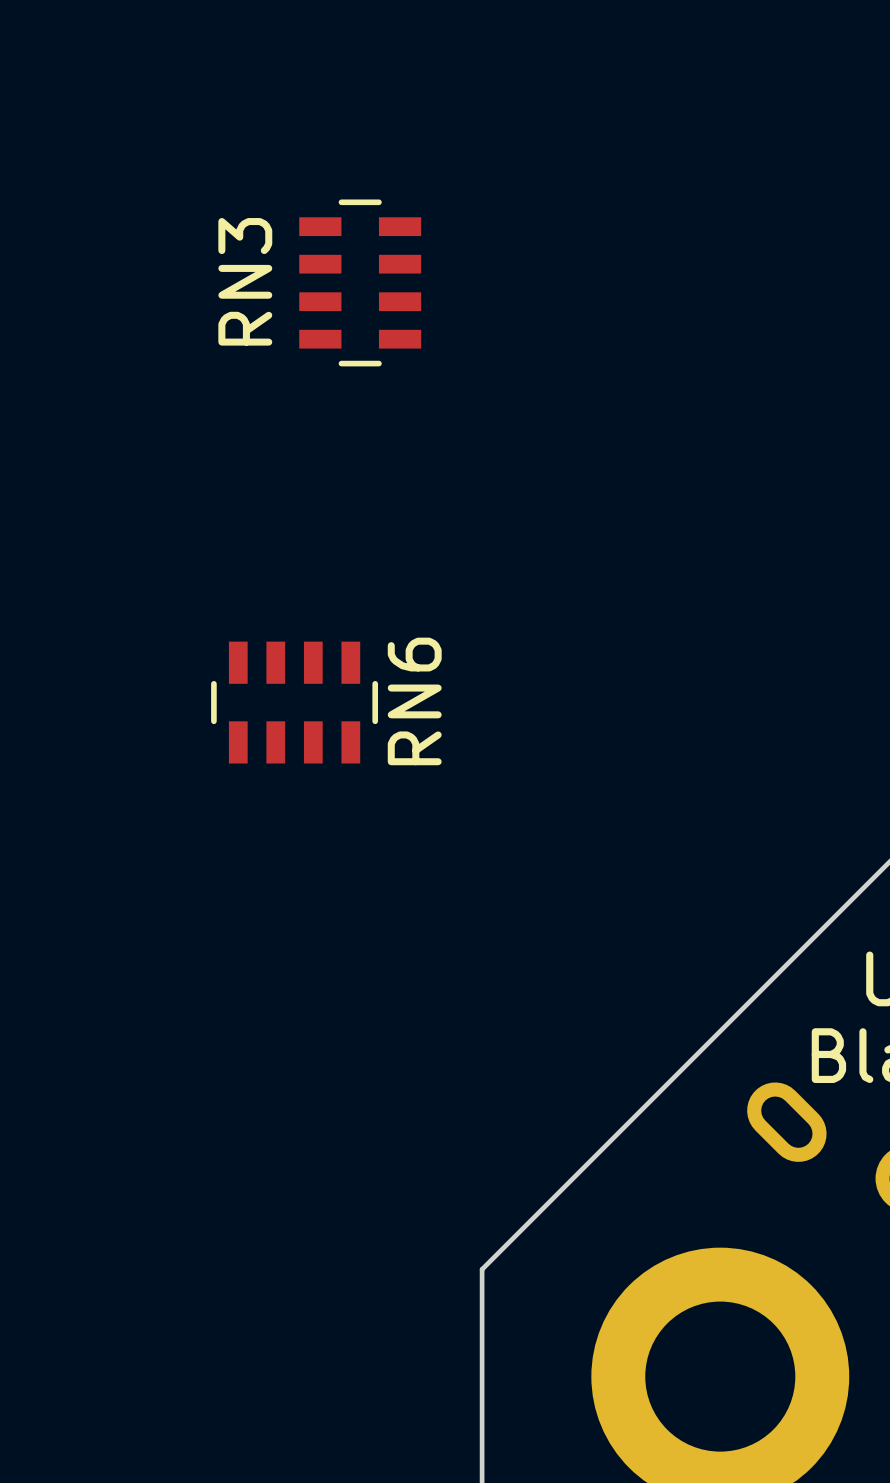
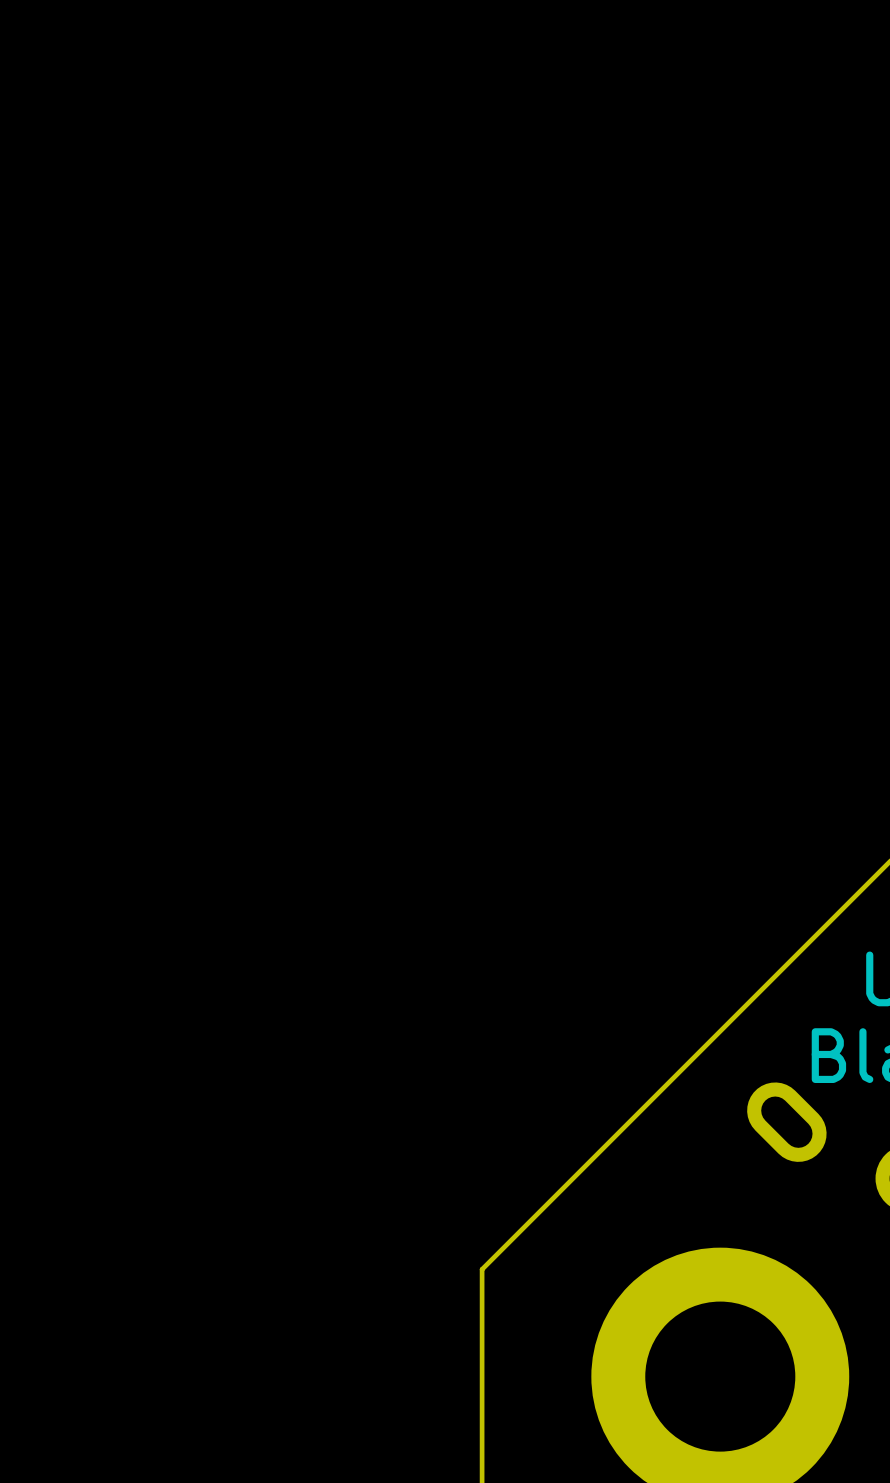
RN3: (360, 282) -> none
RN6: (294, 702) -> none

